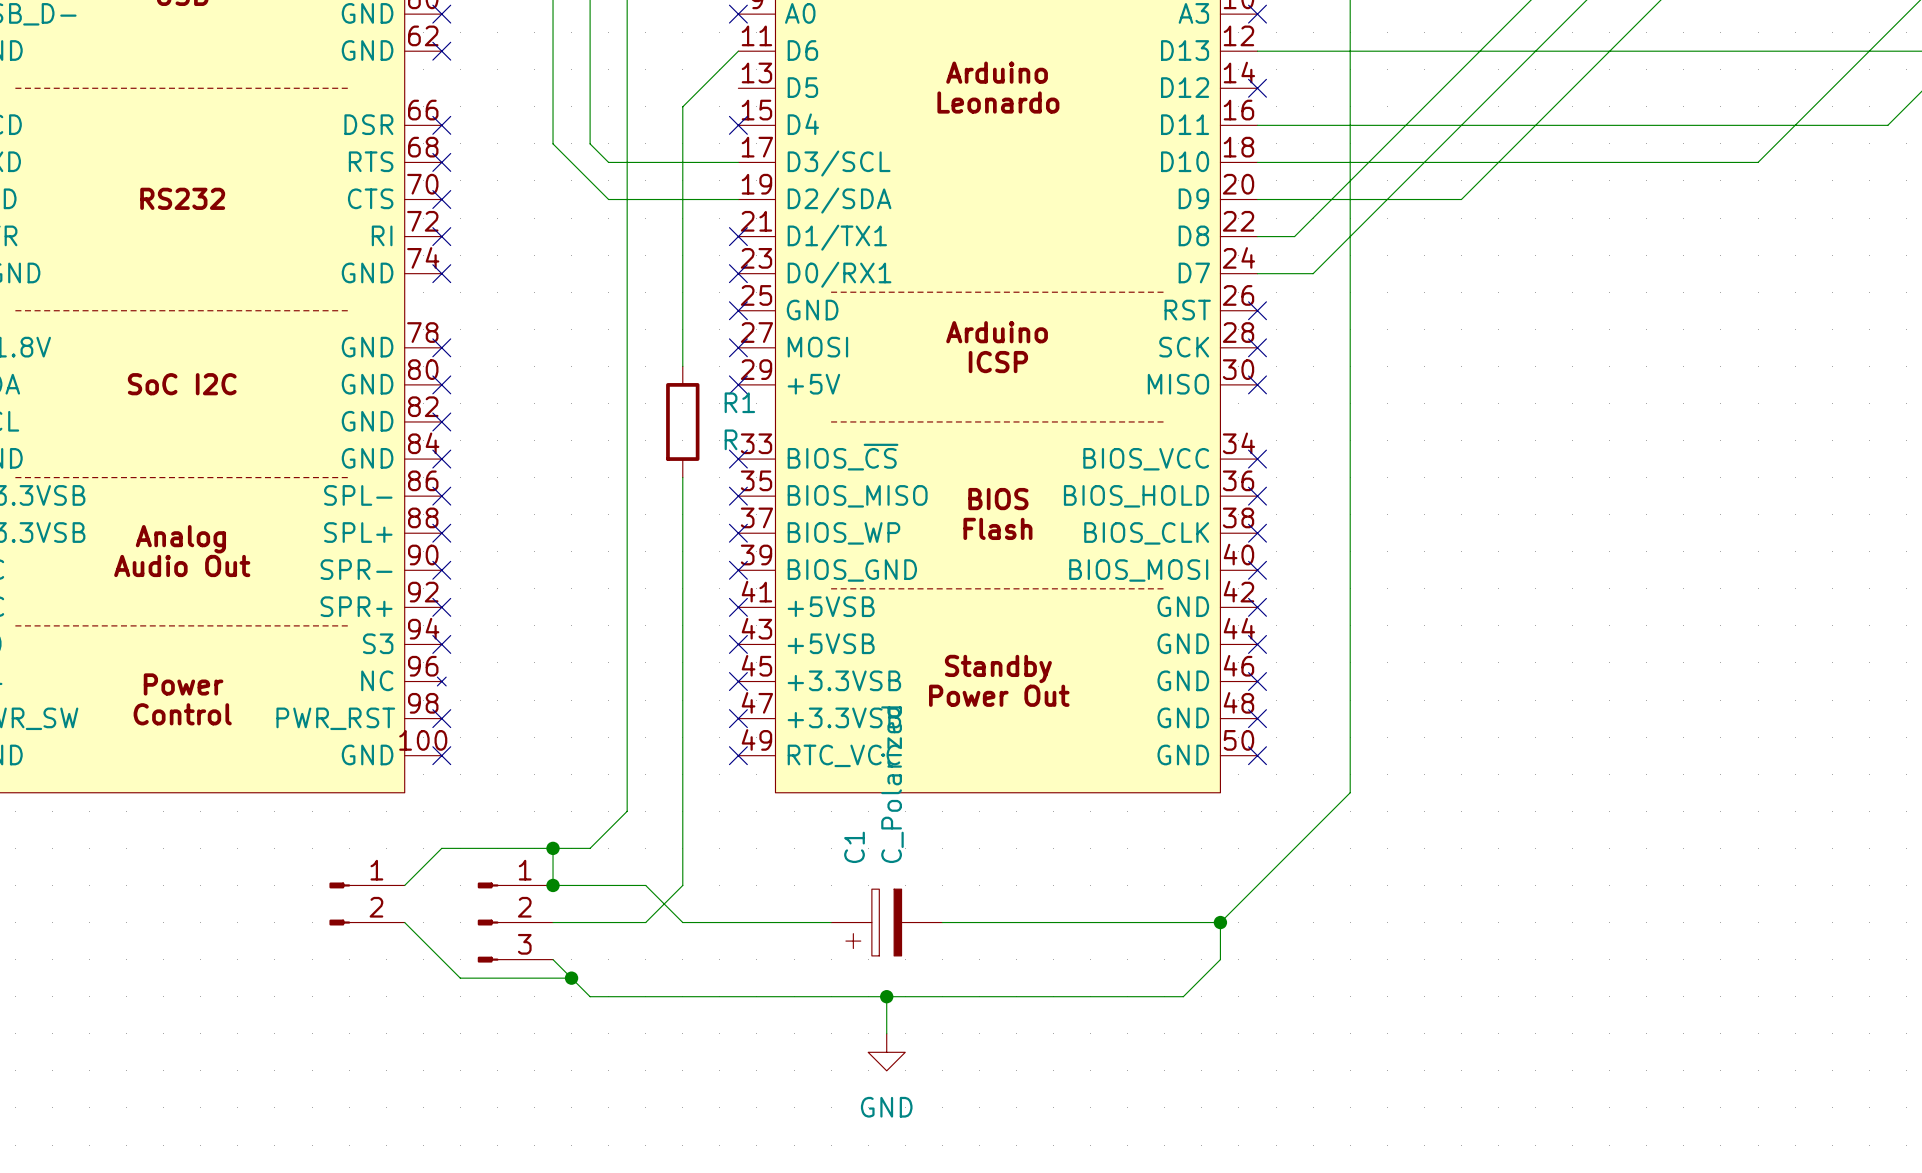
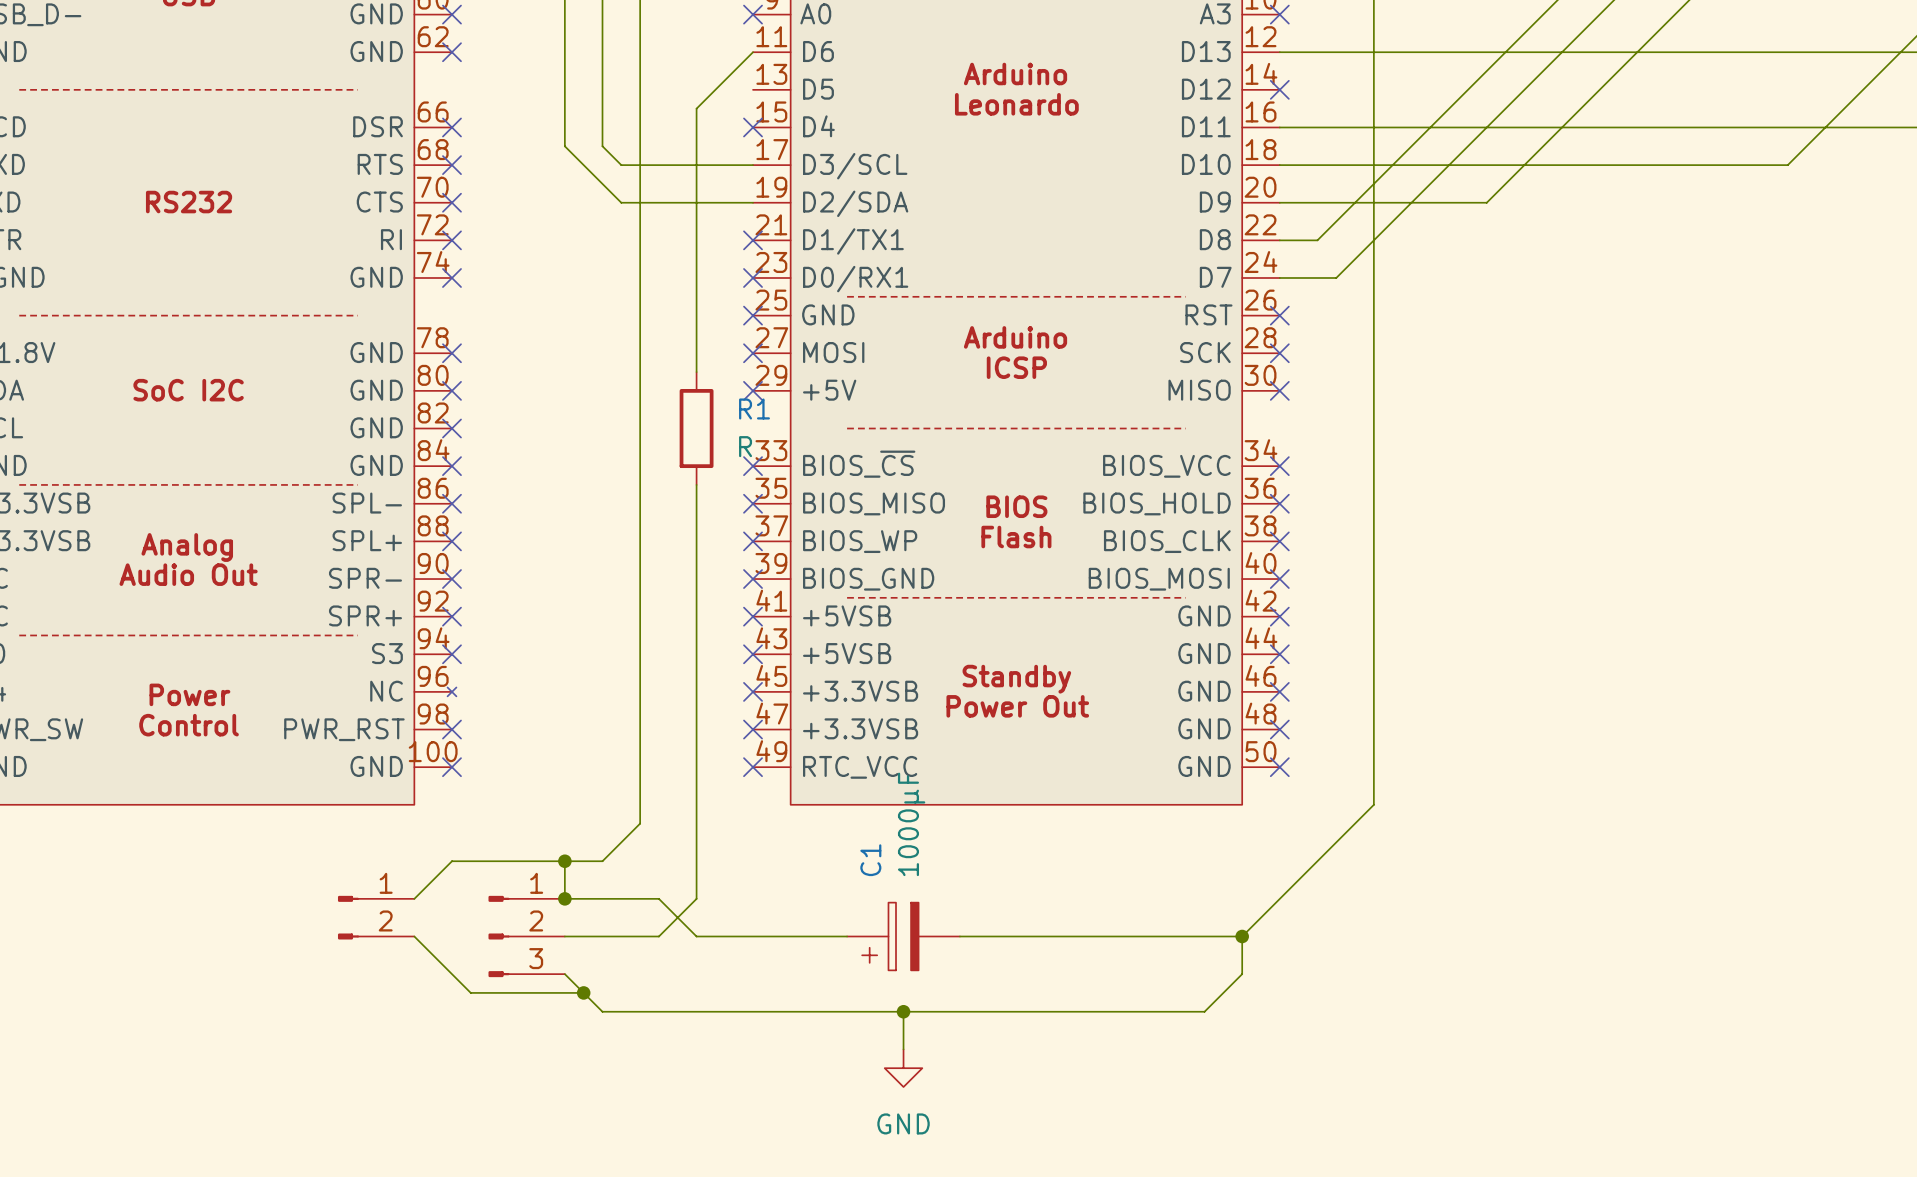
C1 value: C_Polarized (892, 784) -> 1000µF (911, 824)

